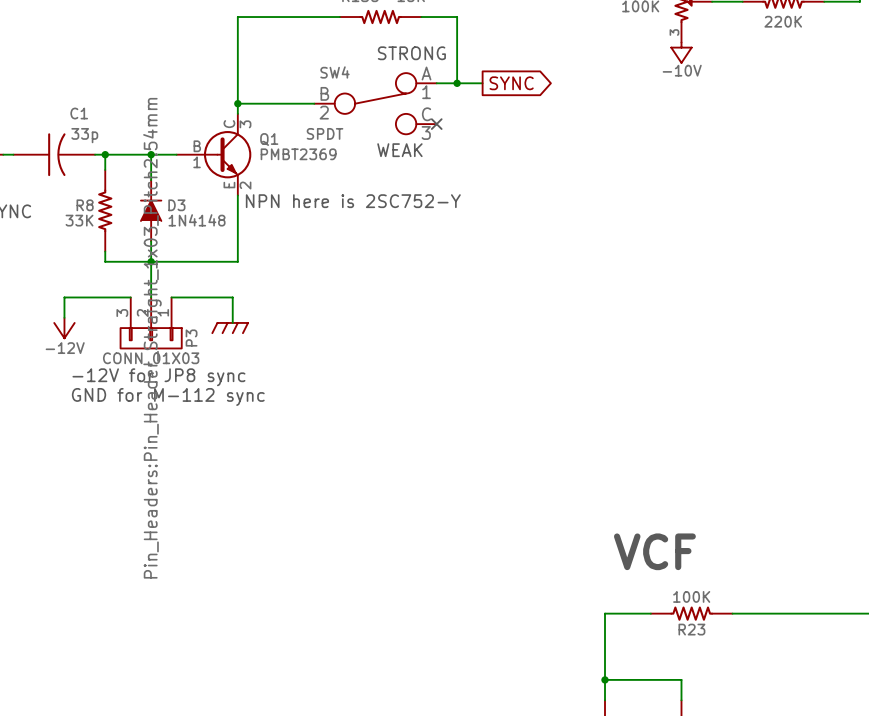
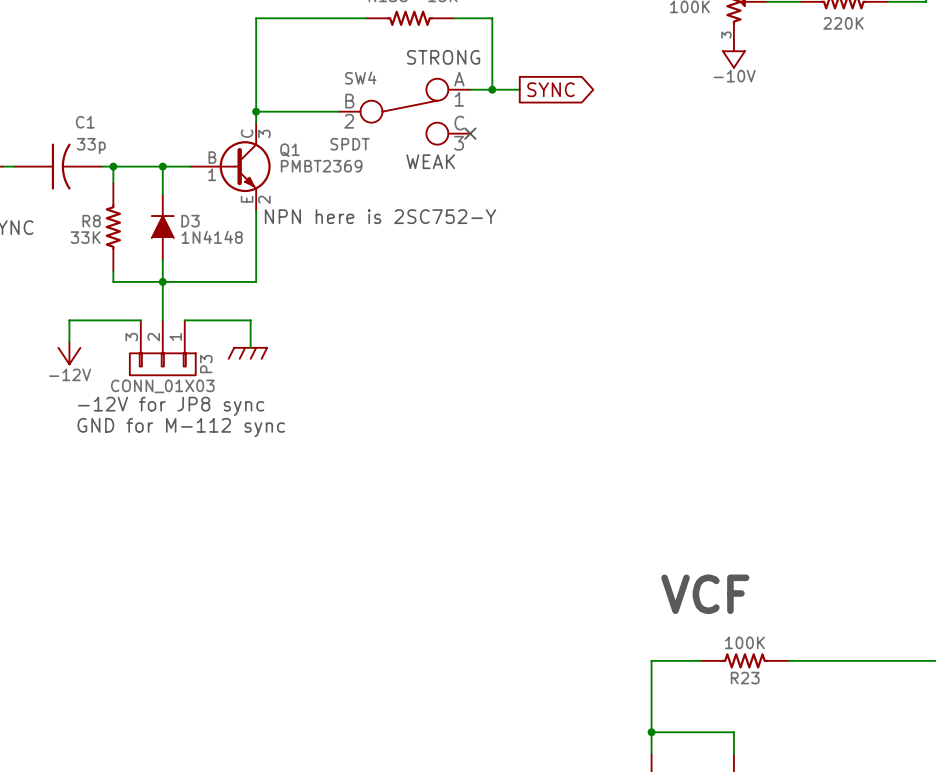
P3 text: Pin_Headers:Pin_Header_Straight_1x03_Pitch2.54mm (152, 338) -> none

